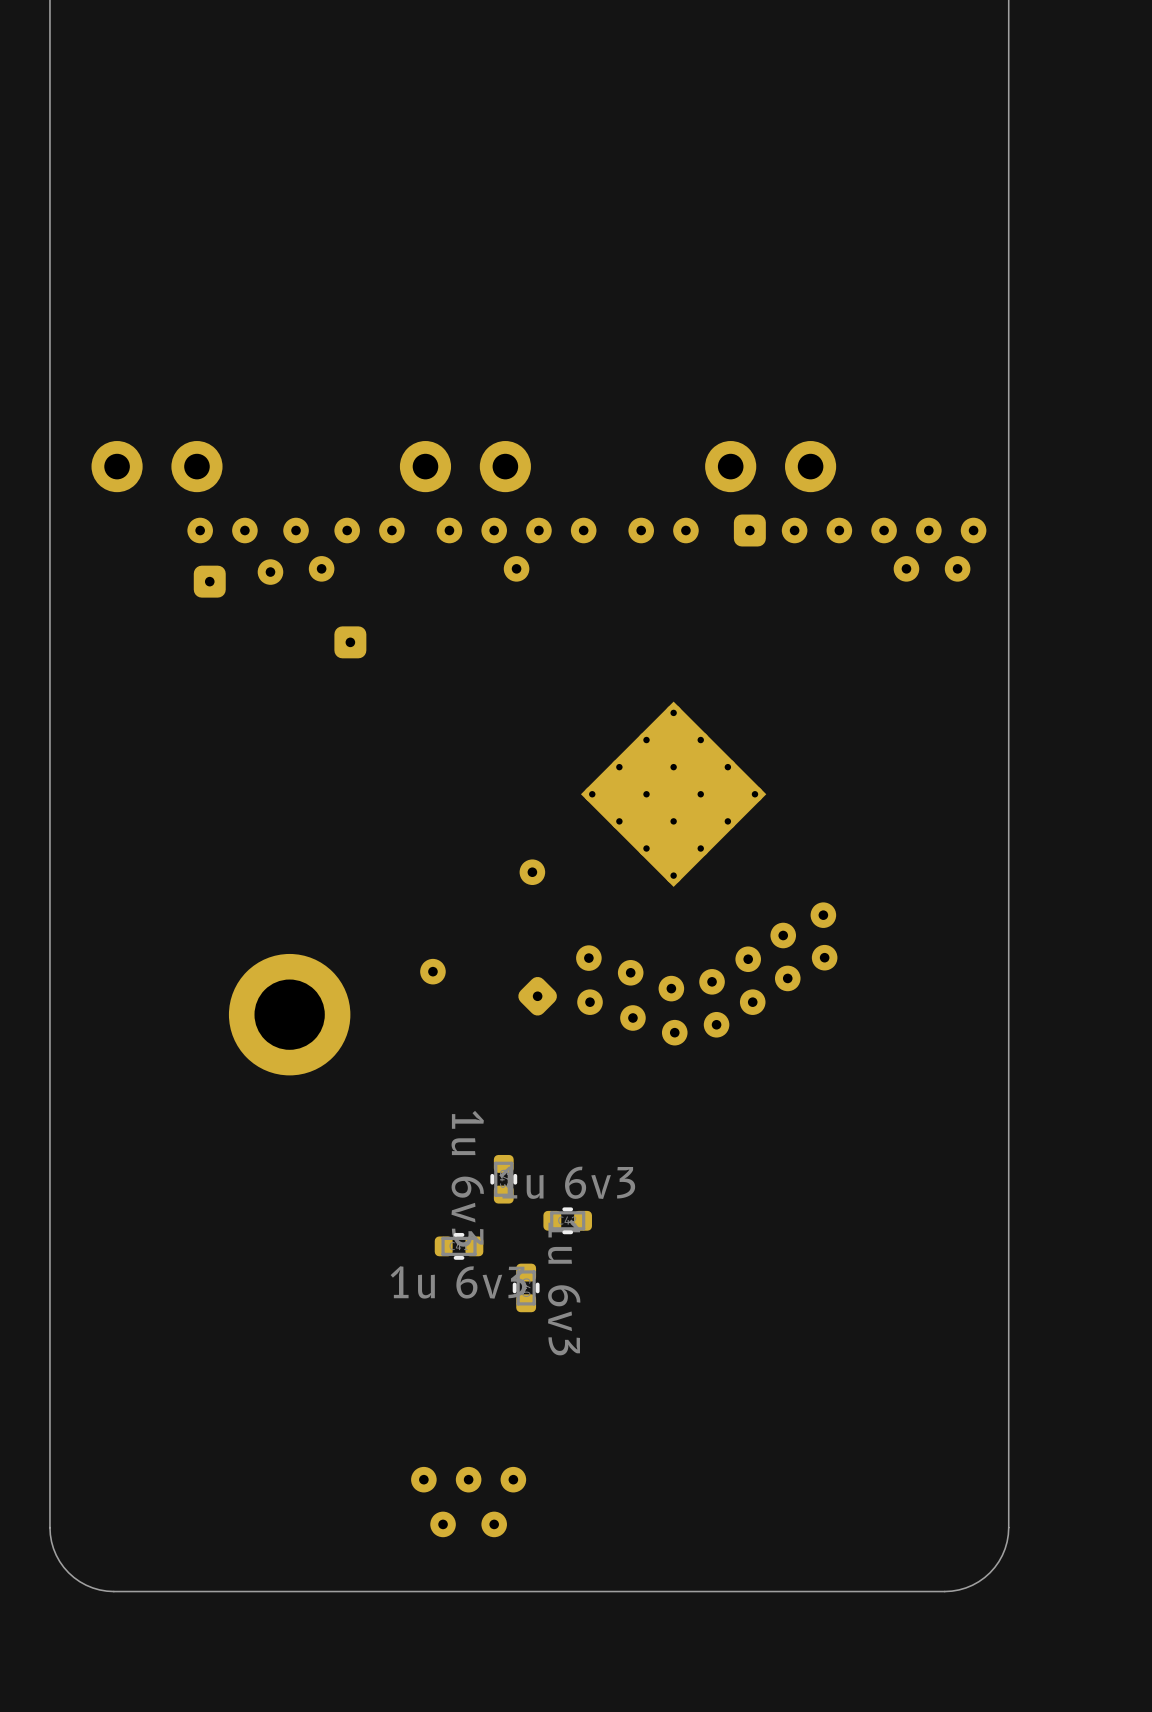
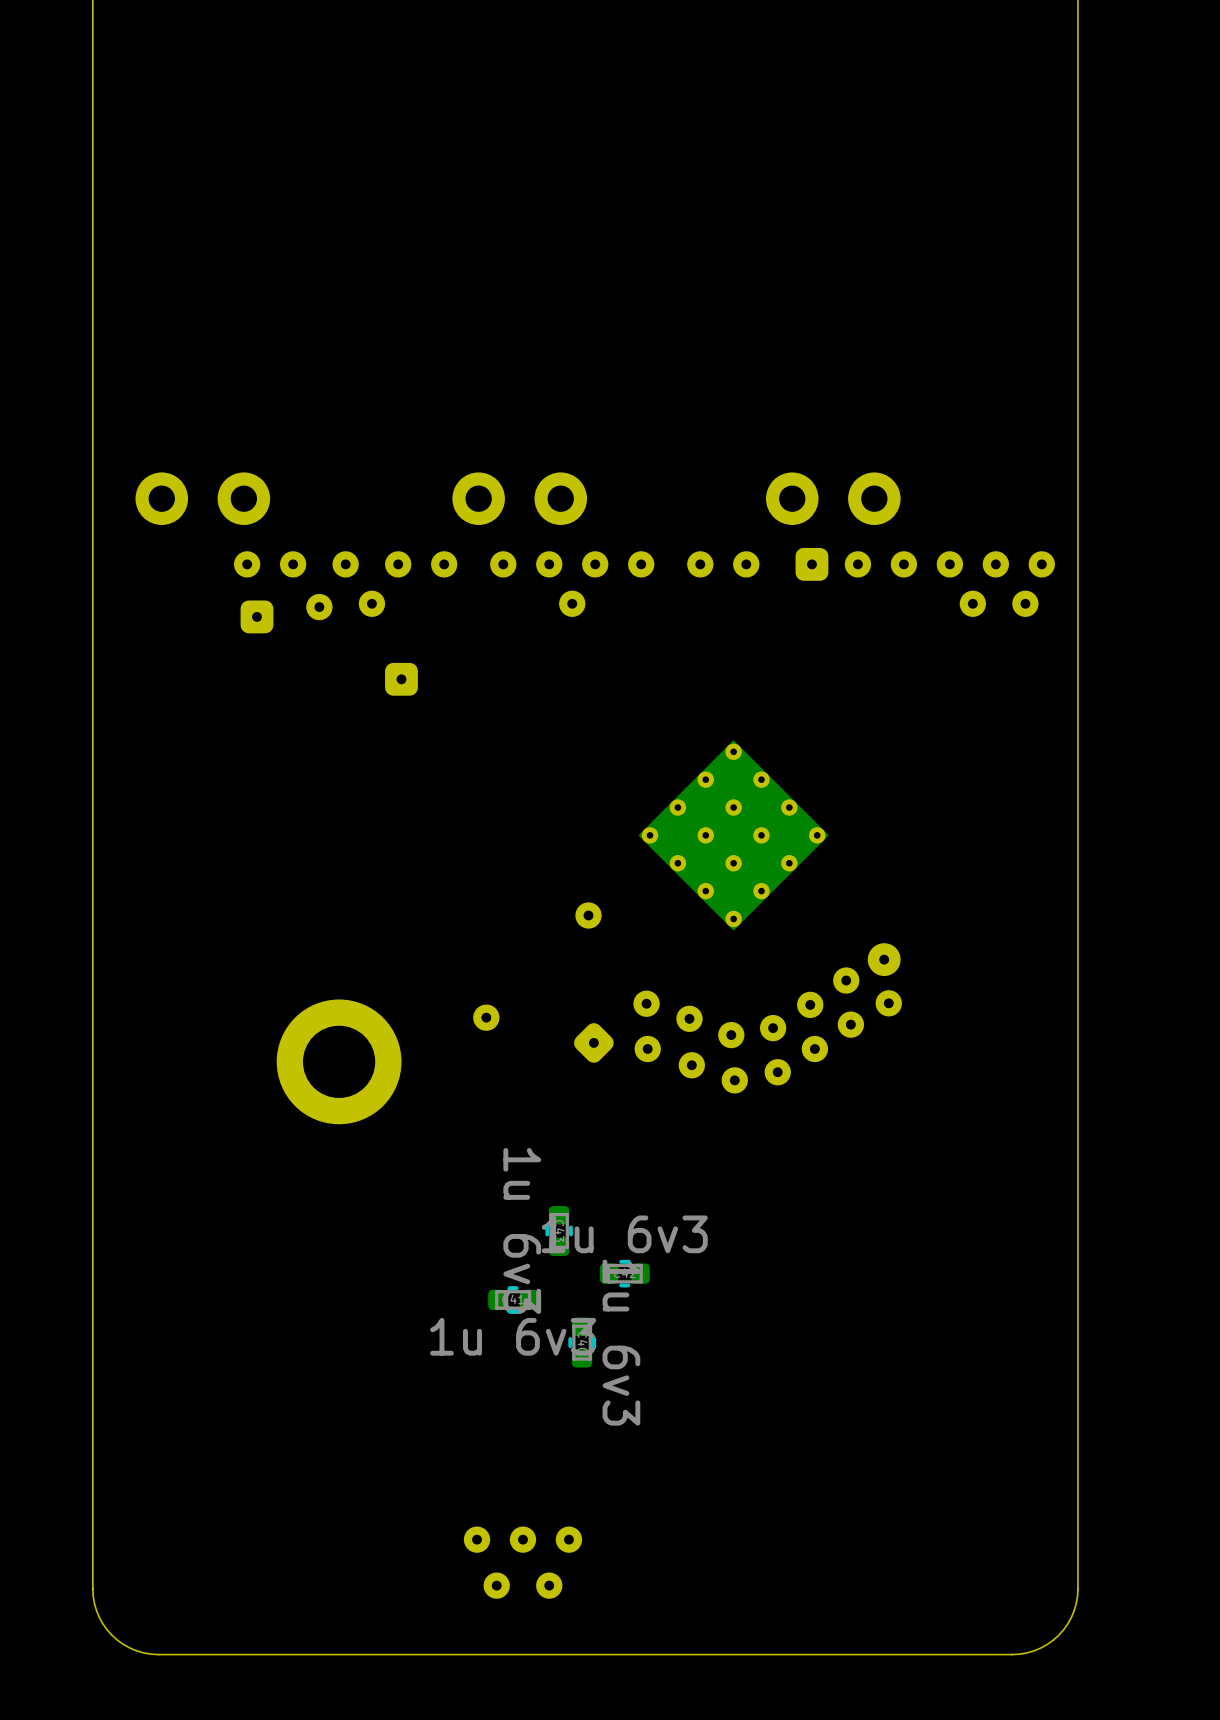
part footprint: [810, 902, 837, 928] -> [867, 943, 901, 977]

